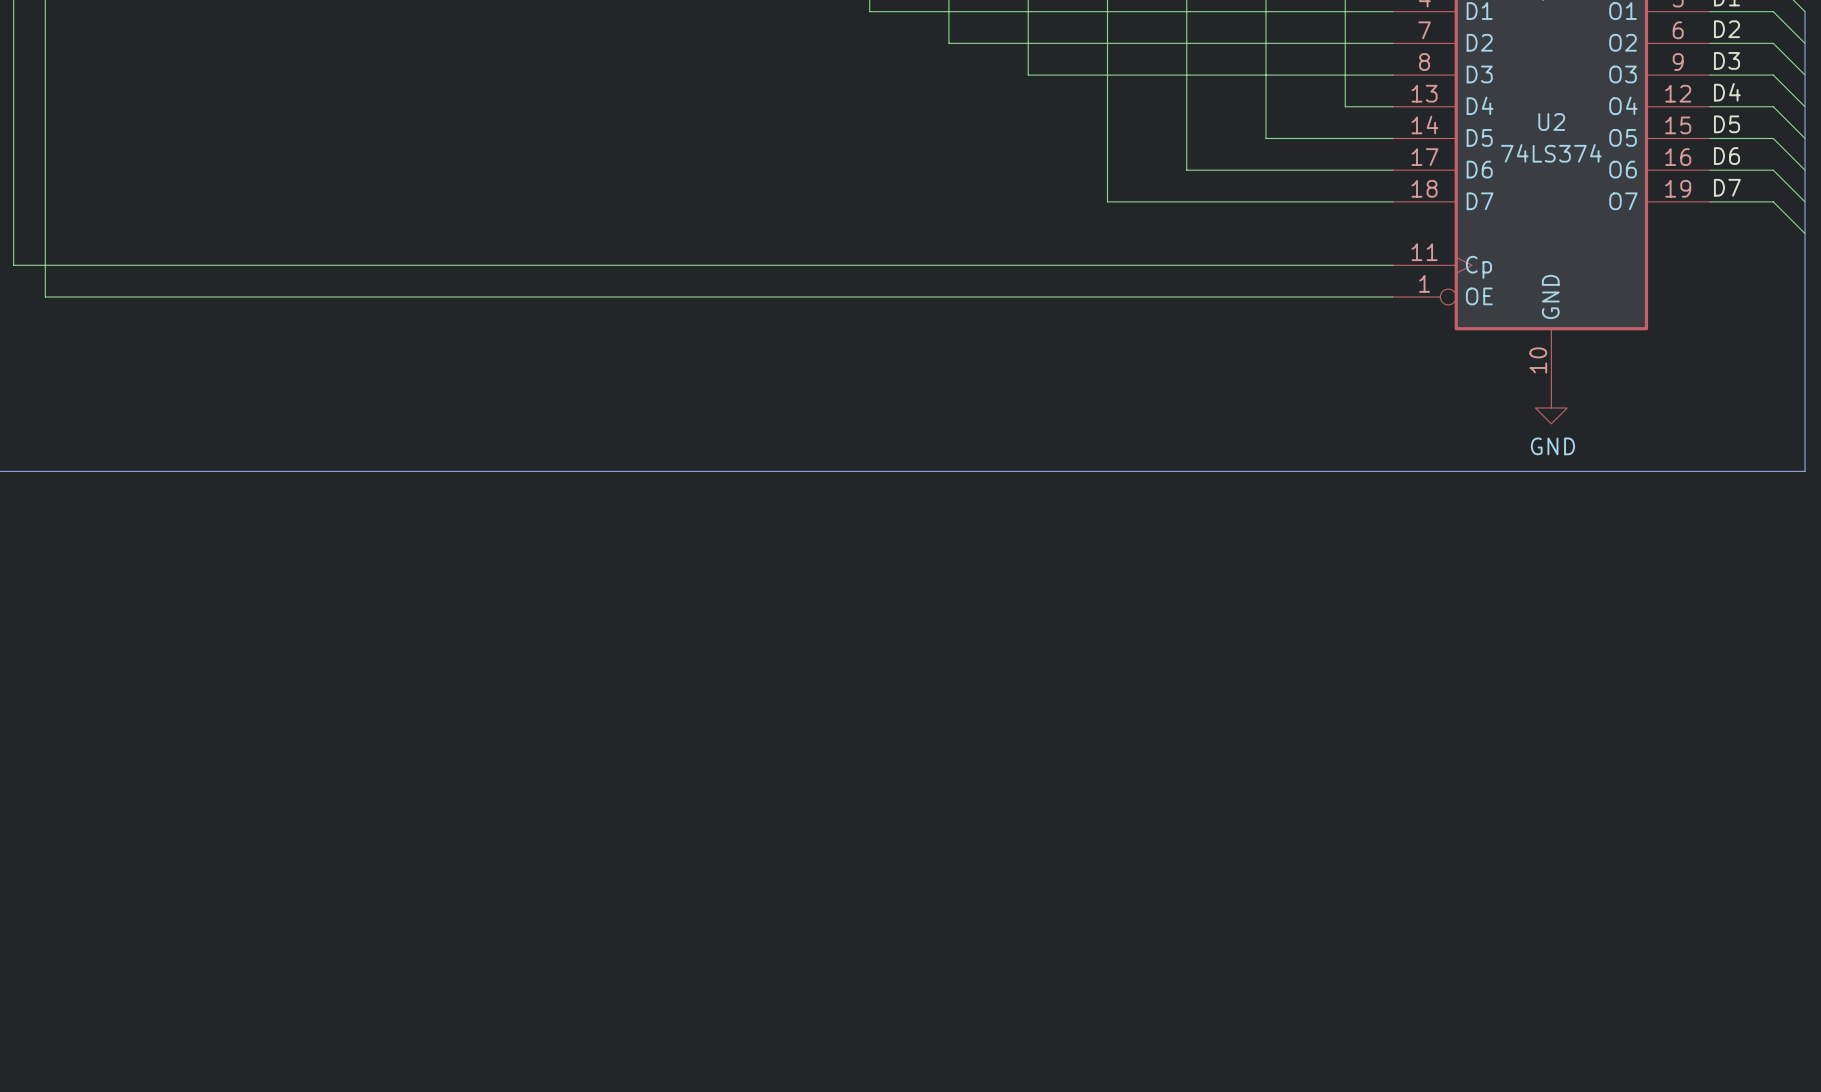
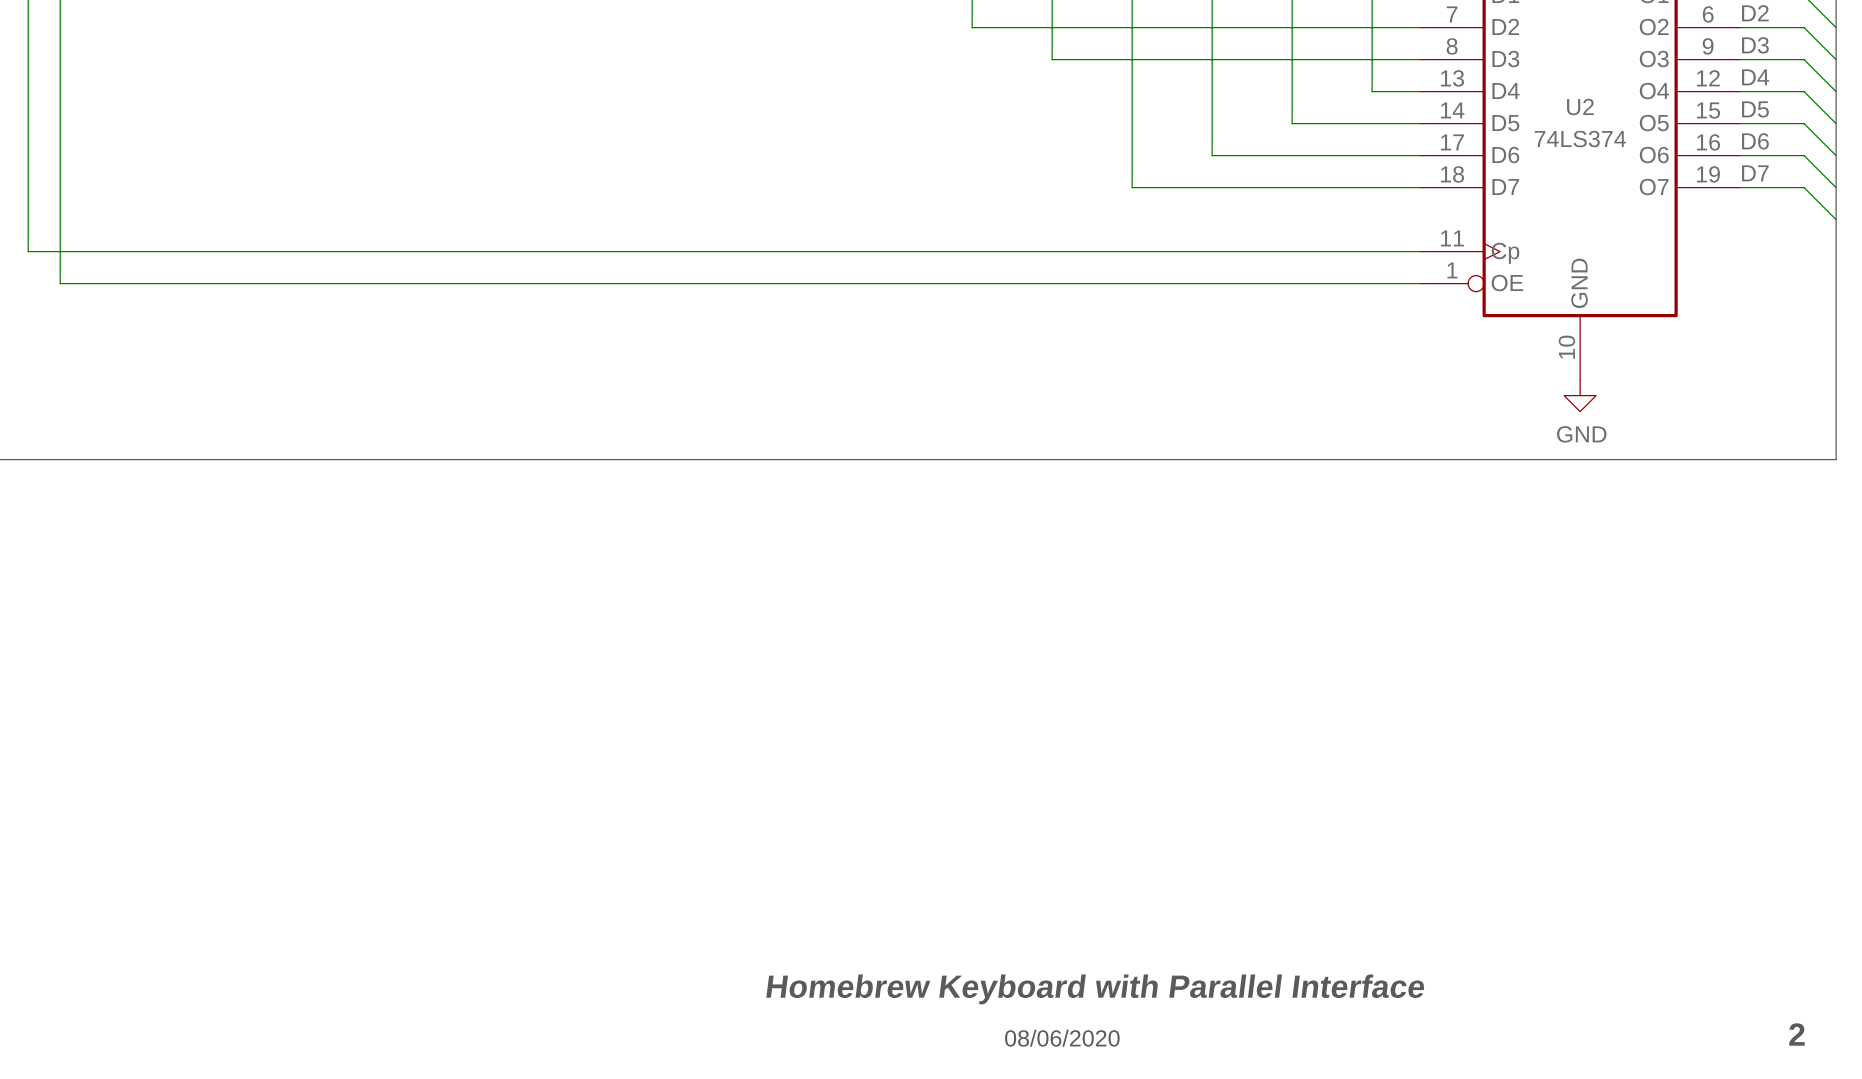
text: none -> Homebrew Keyboard with Parallel Interface (1095, 989)
text: none -> 2 (1796, 1034)
text: none -> 08/06/2020 (1062, 1038)

